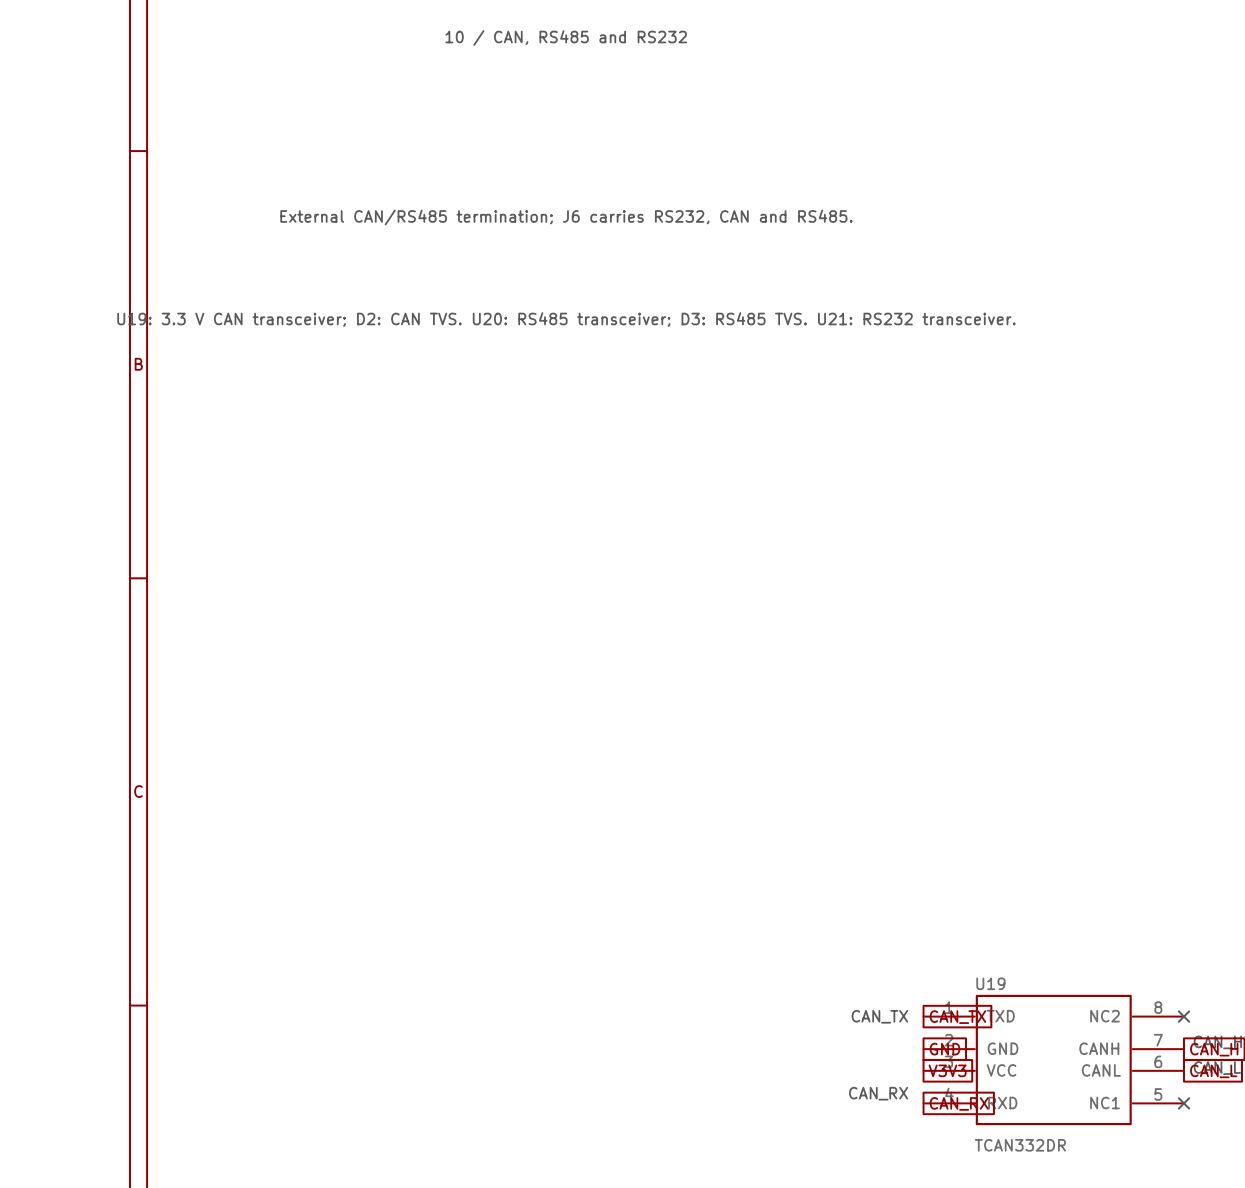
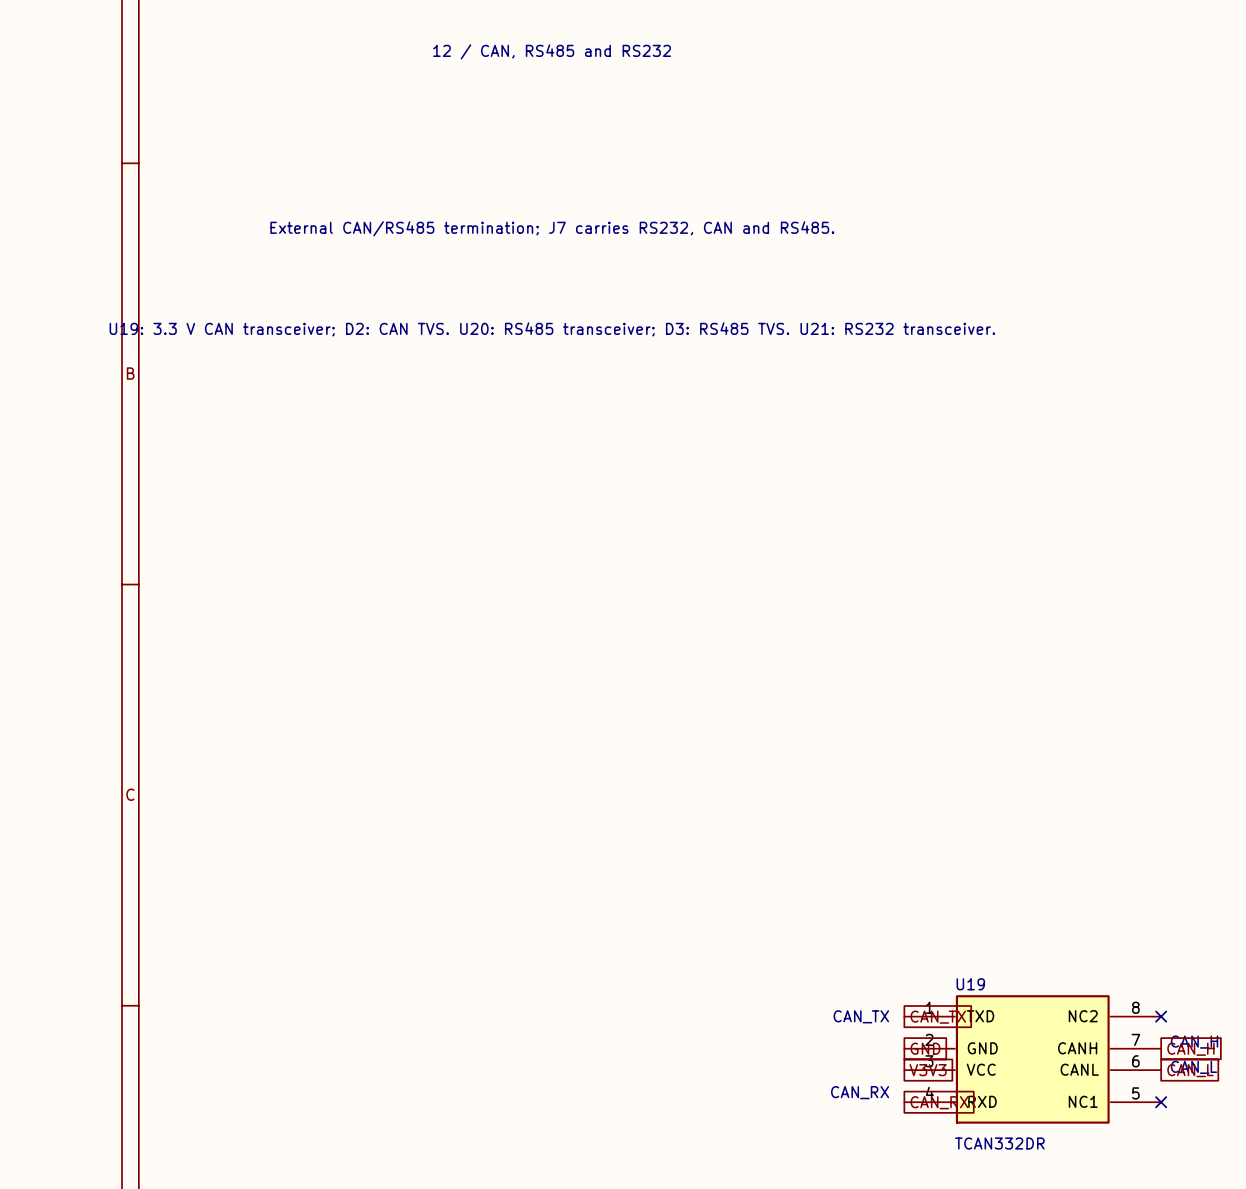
text: 10 / CAN, RS485 and RS232 (566, 38) -> 12 / CAN, RS485 and RS232 (552, 51)
text: External CAN/RS485 termination; J6 carries RS232, CAN and RS485. (566, 217) -> External CAN/RS485 termination; J7 carries RS232, CAN and RS485. (552, 228)

